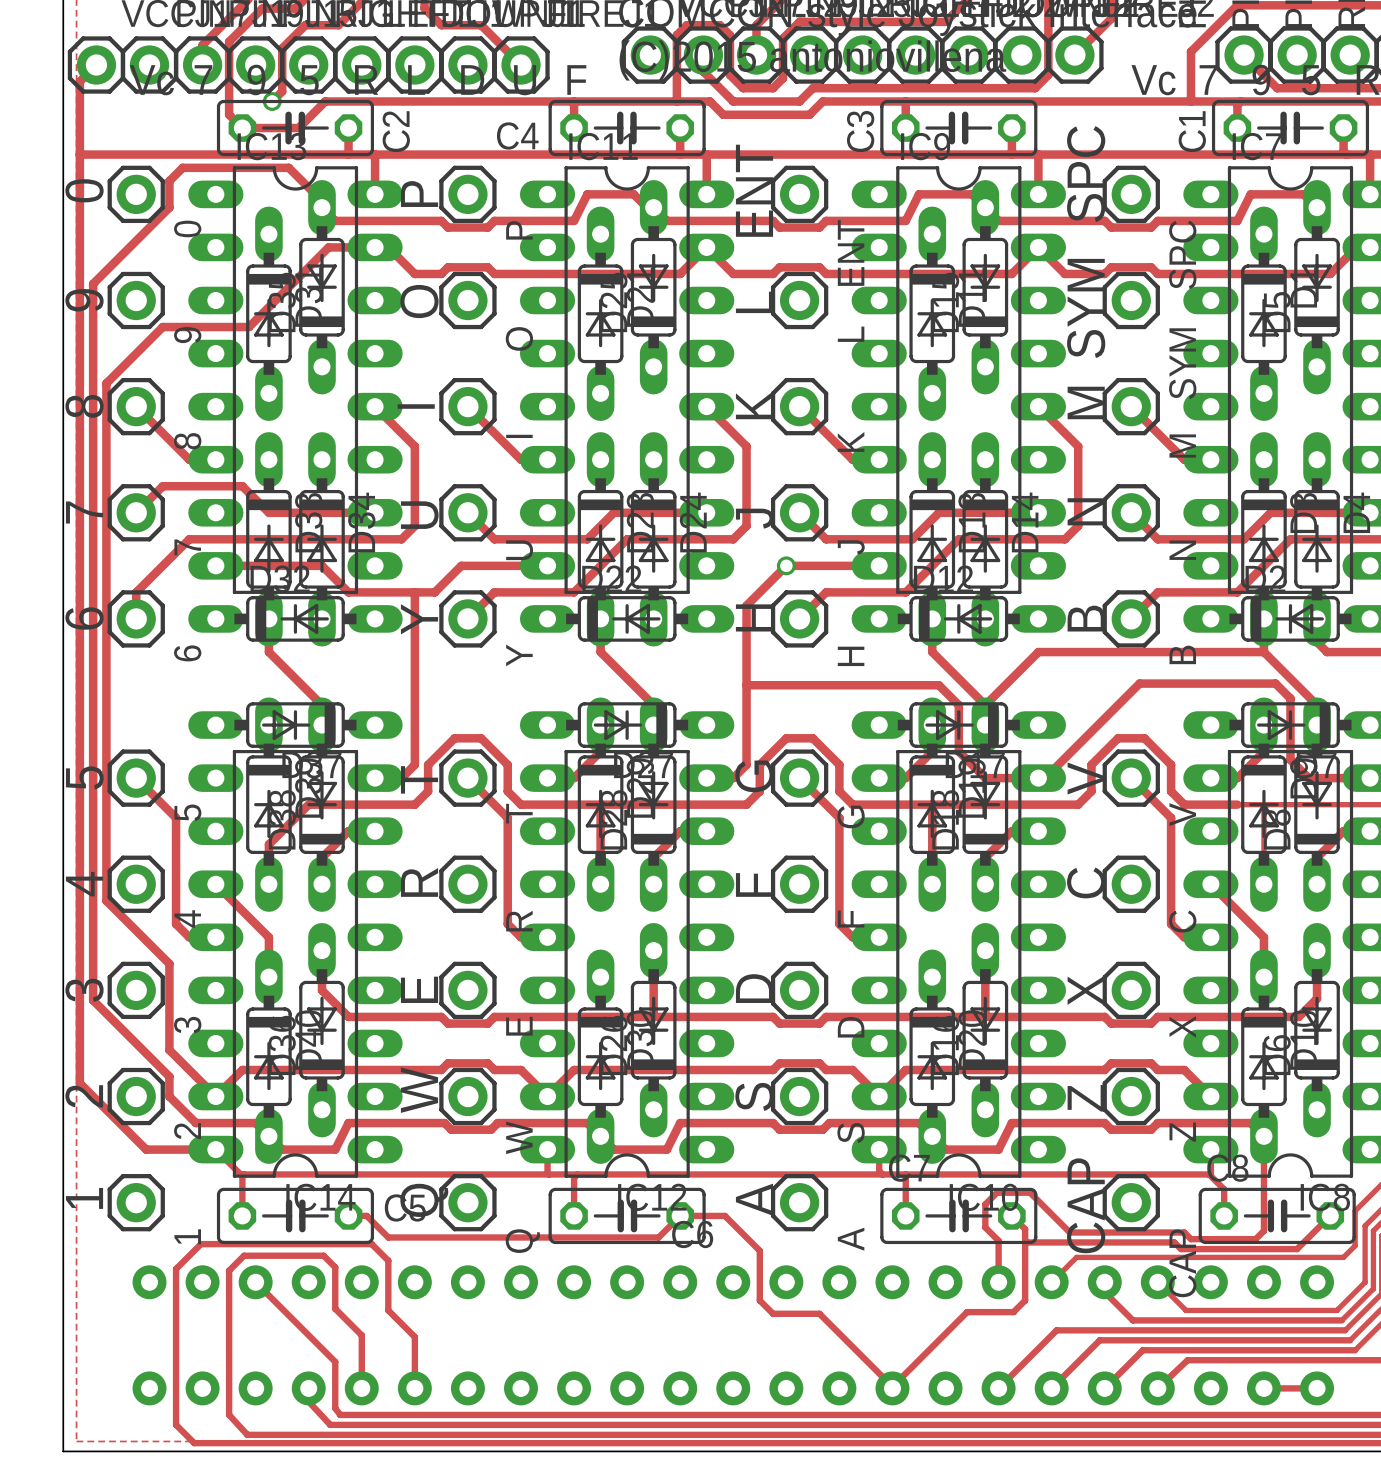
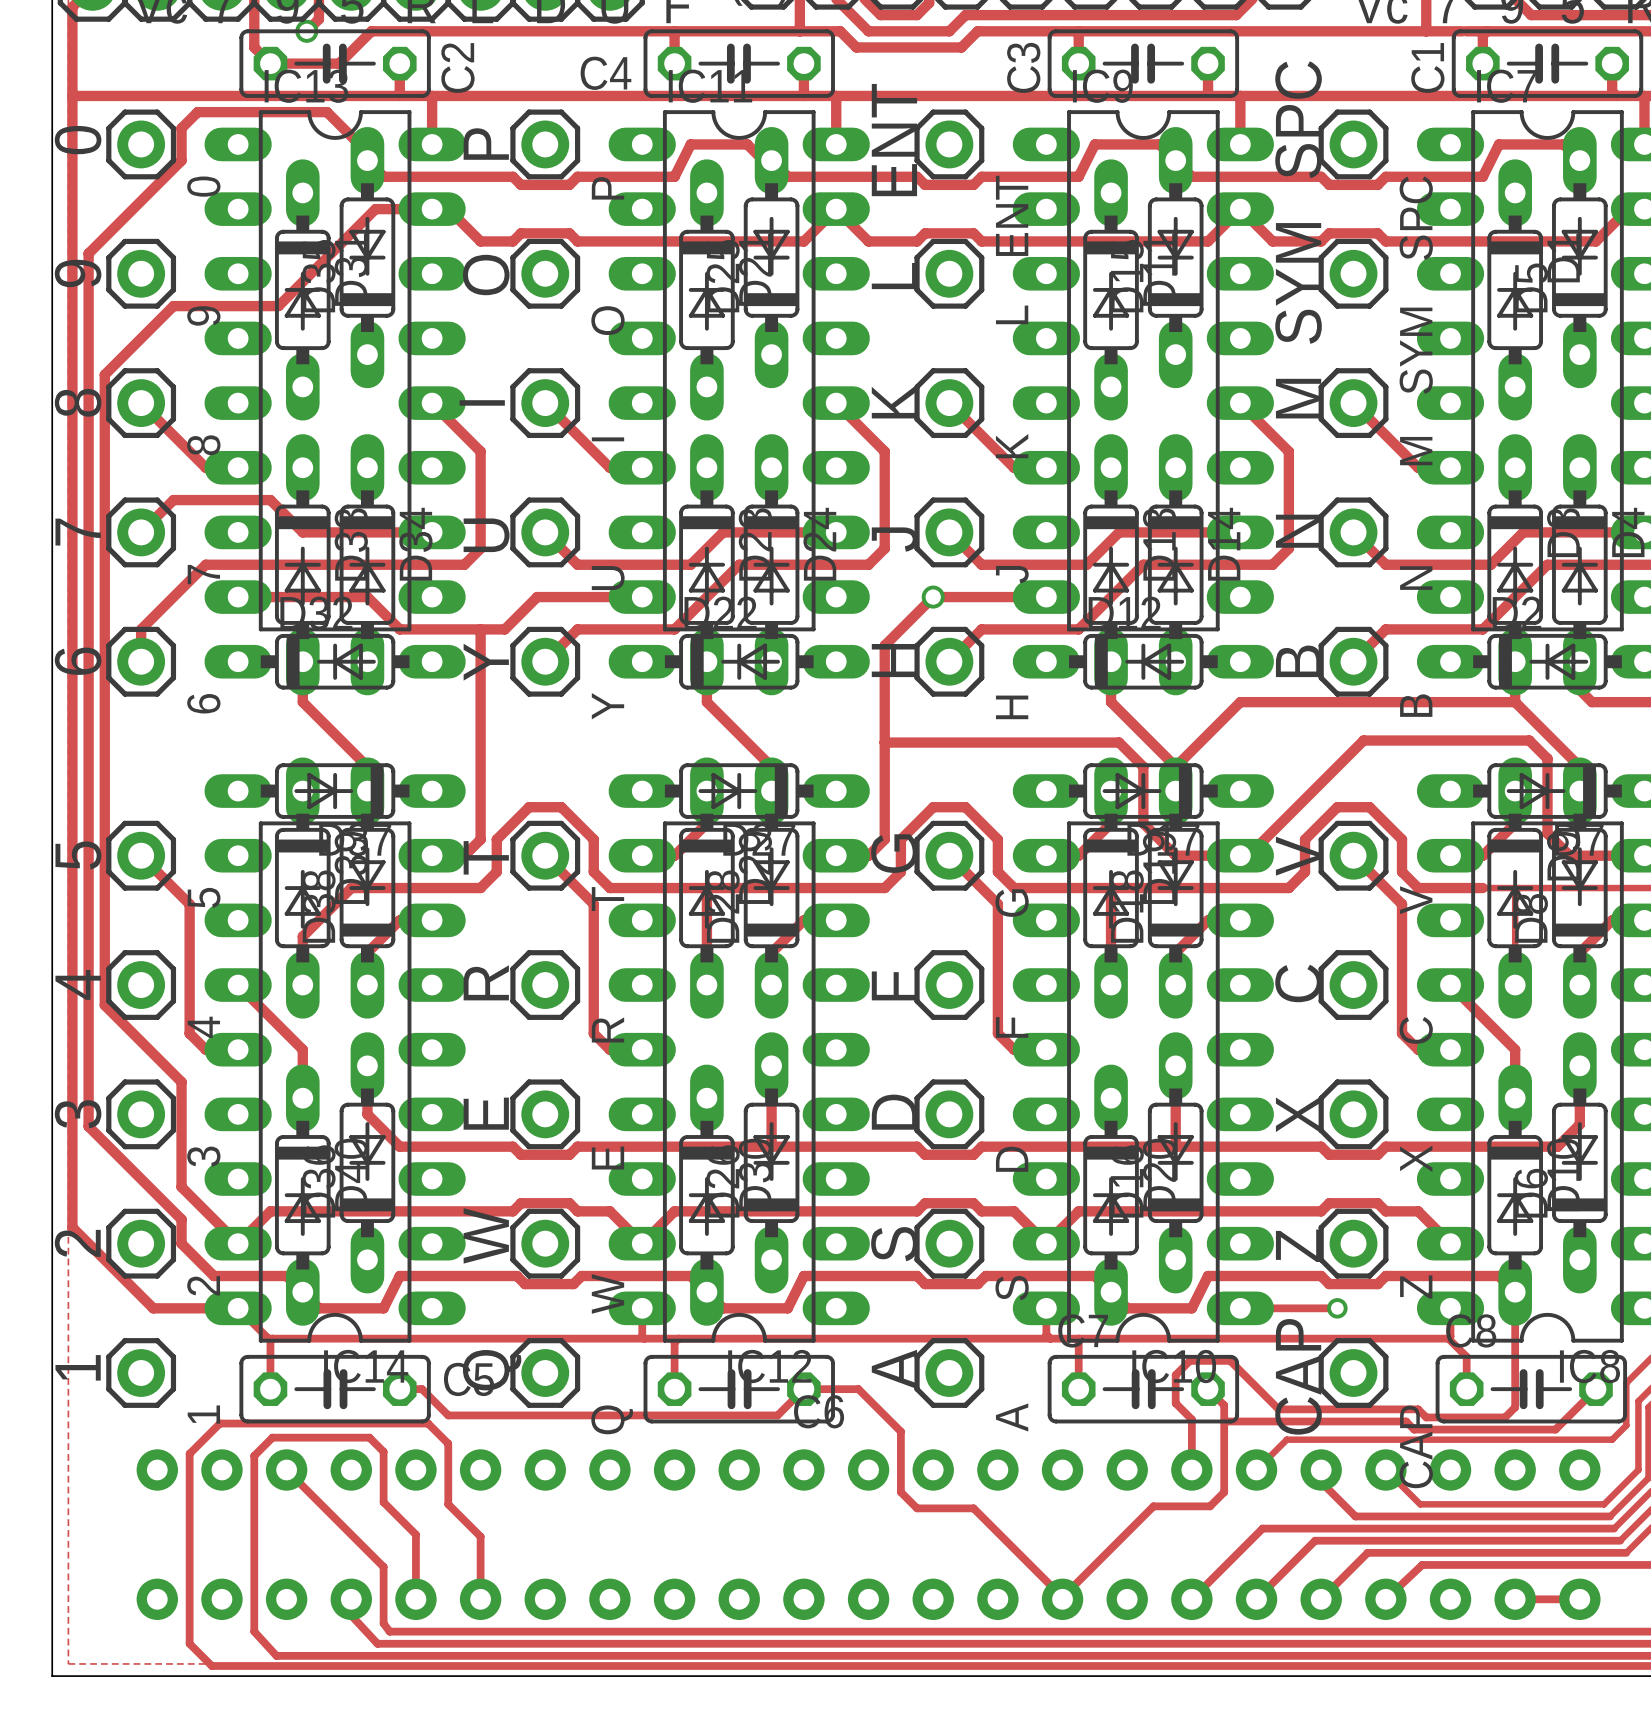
track: none -> (1240, 1308) (1337, 1308)
via: none -> (1337, 1308)

